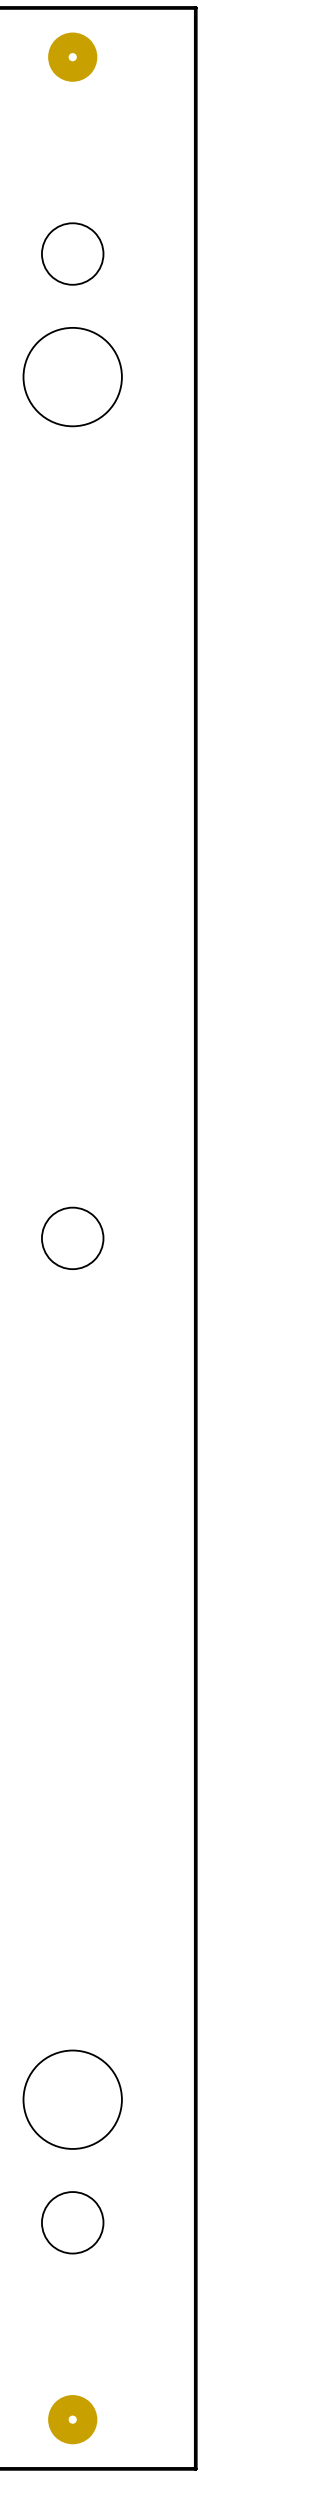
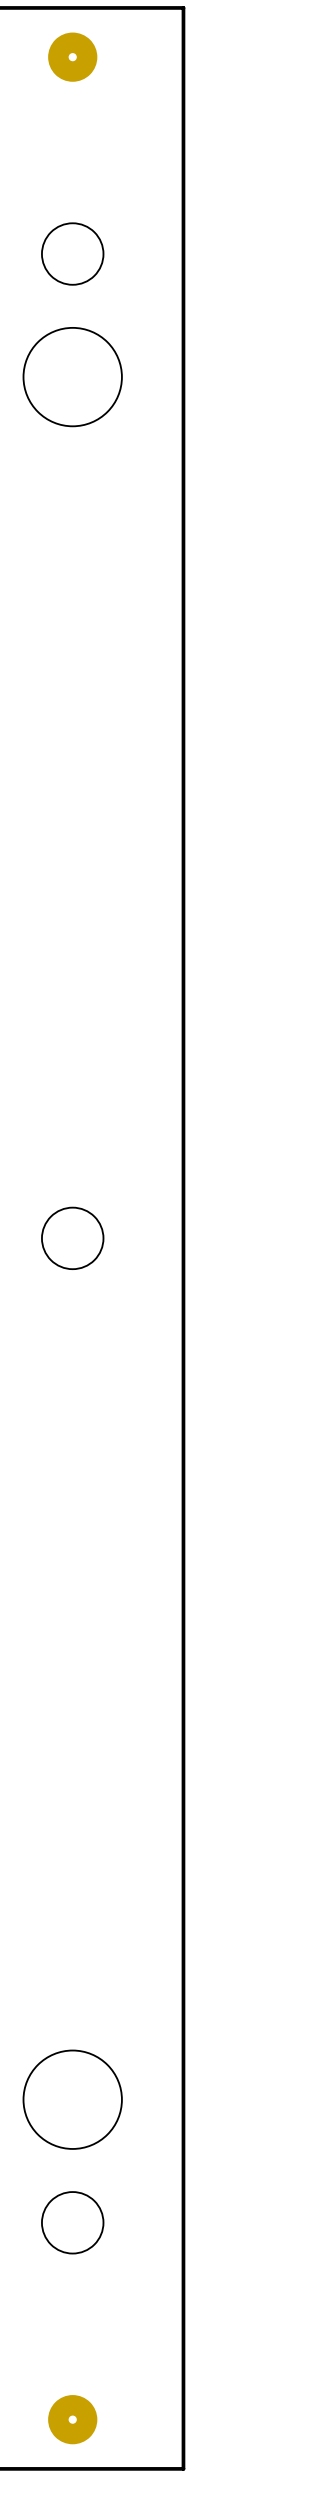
board edge: (183, 7) (195, 7) (195, 2468) (183, 2468) -> (183, 7) (183, 2468)

